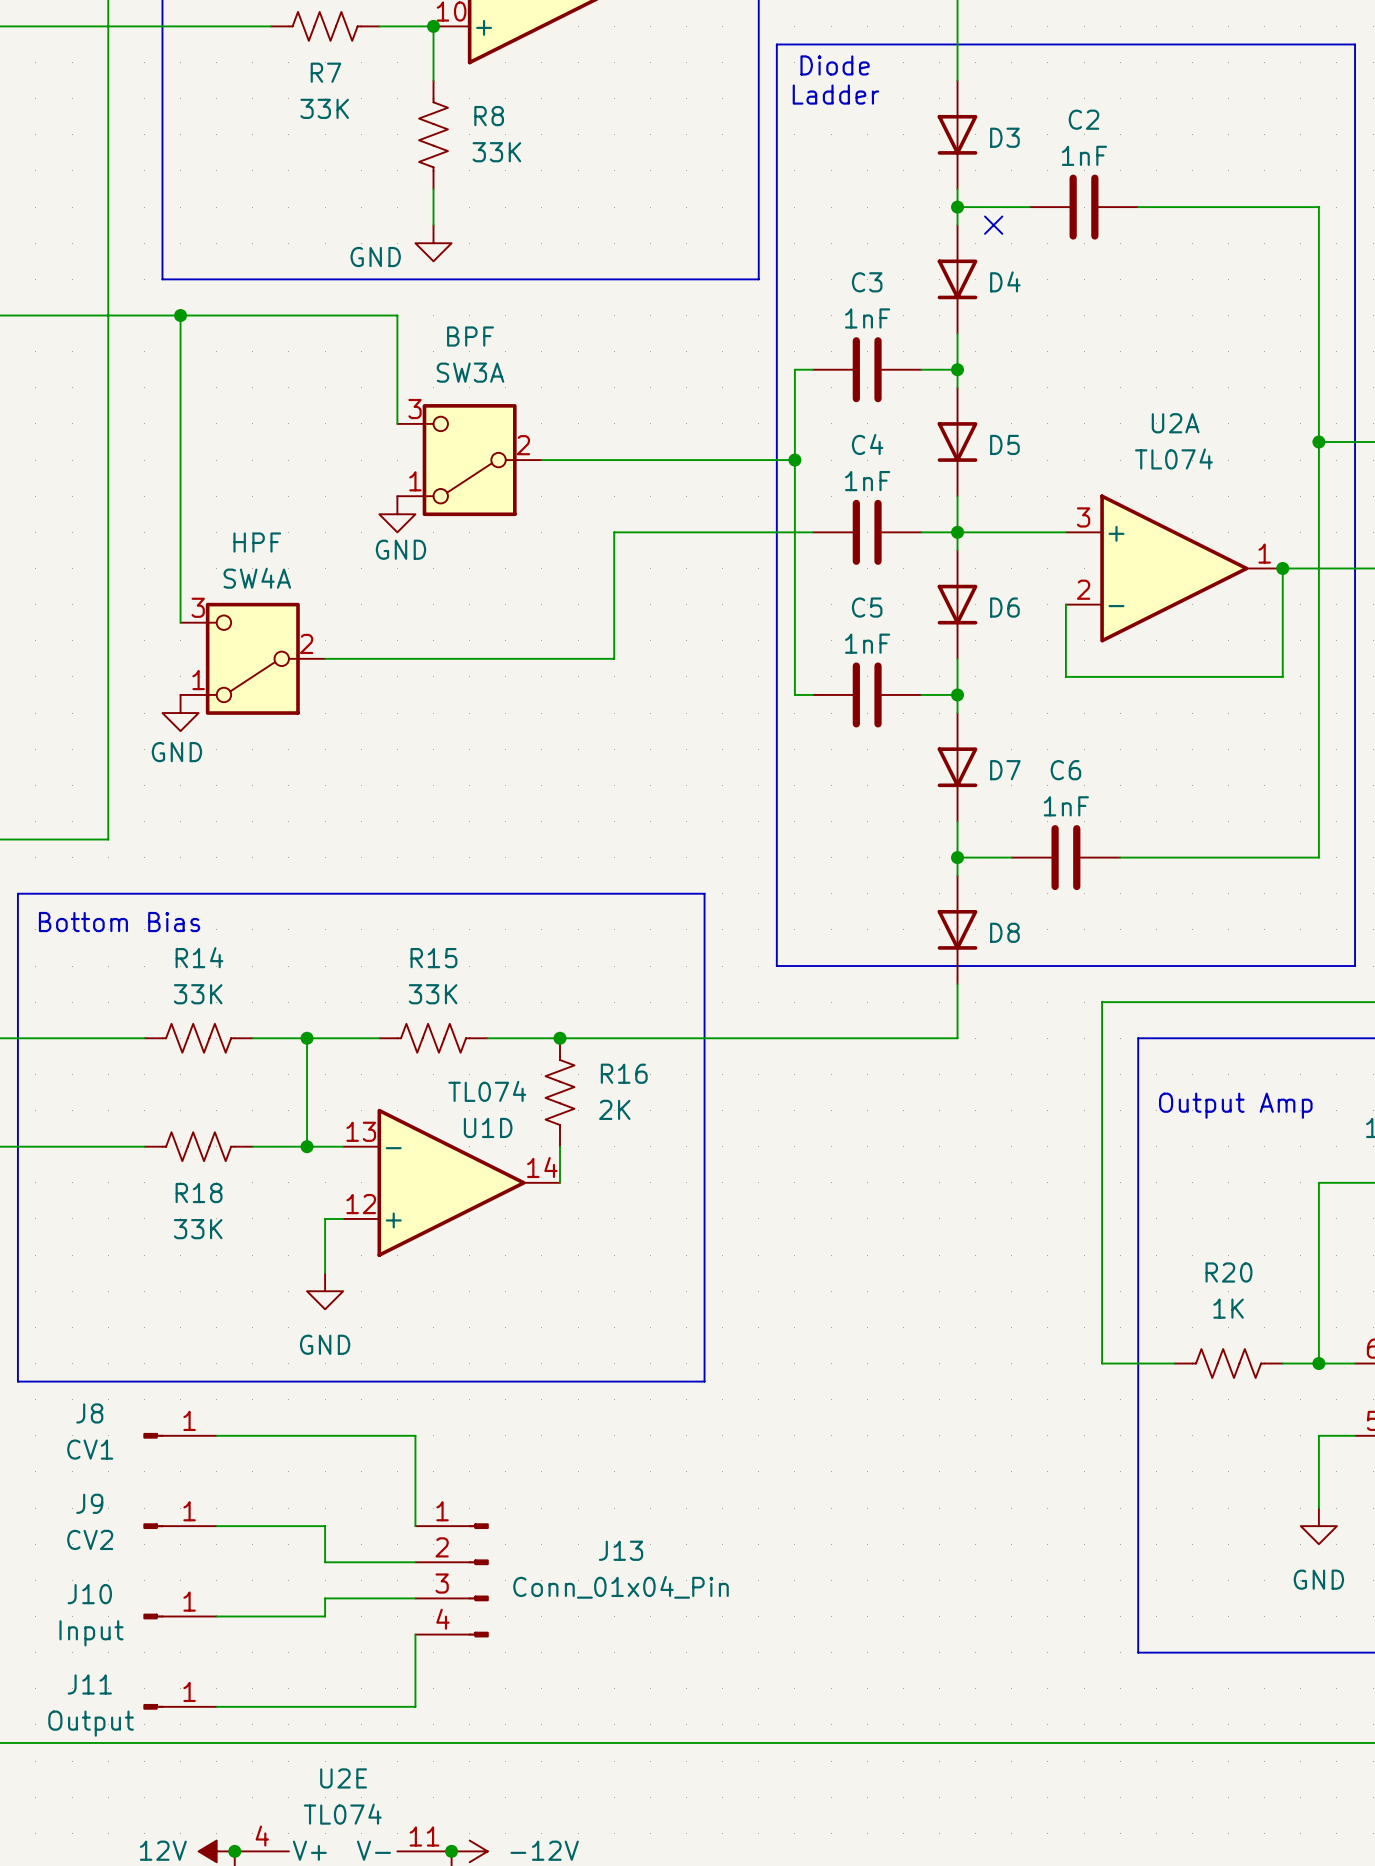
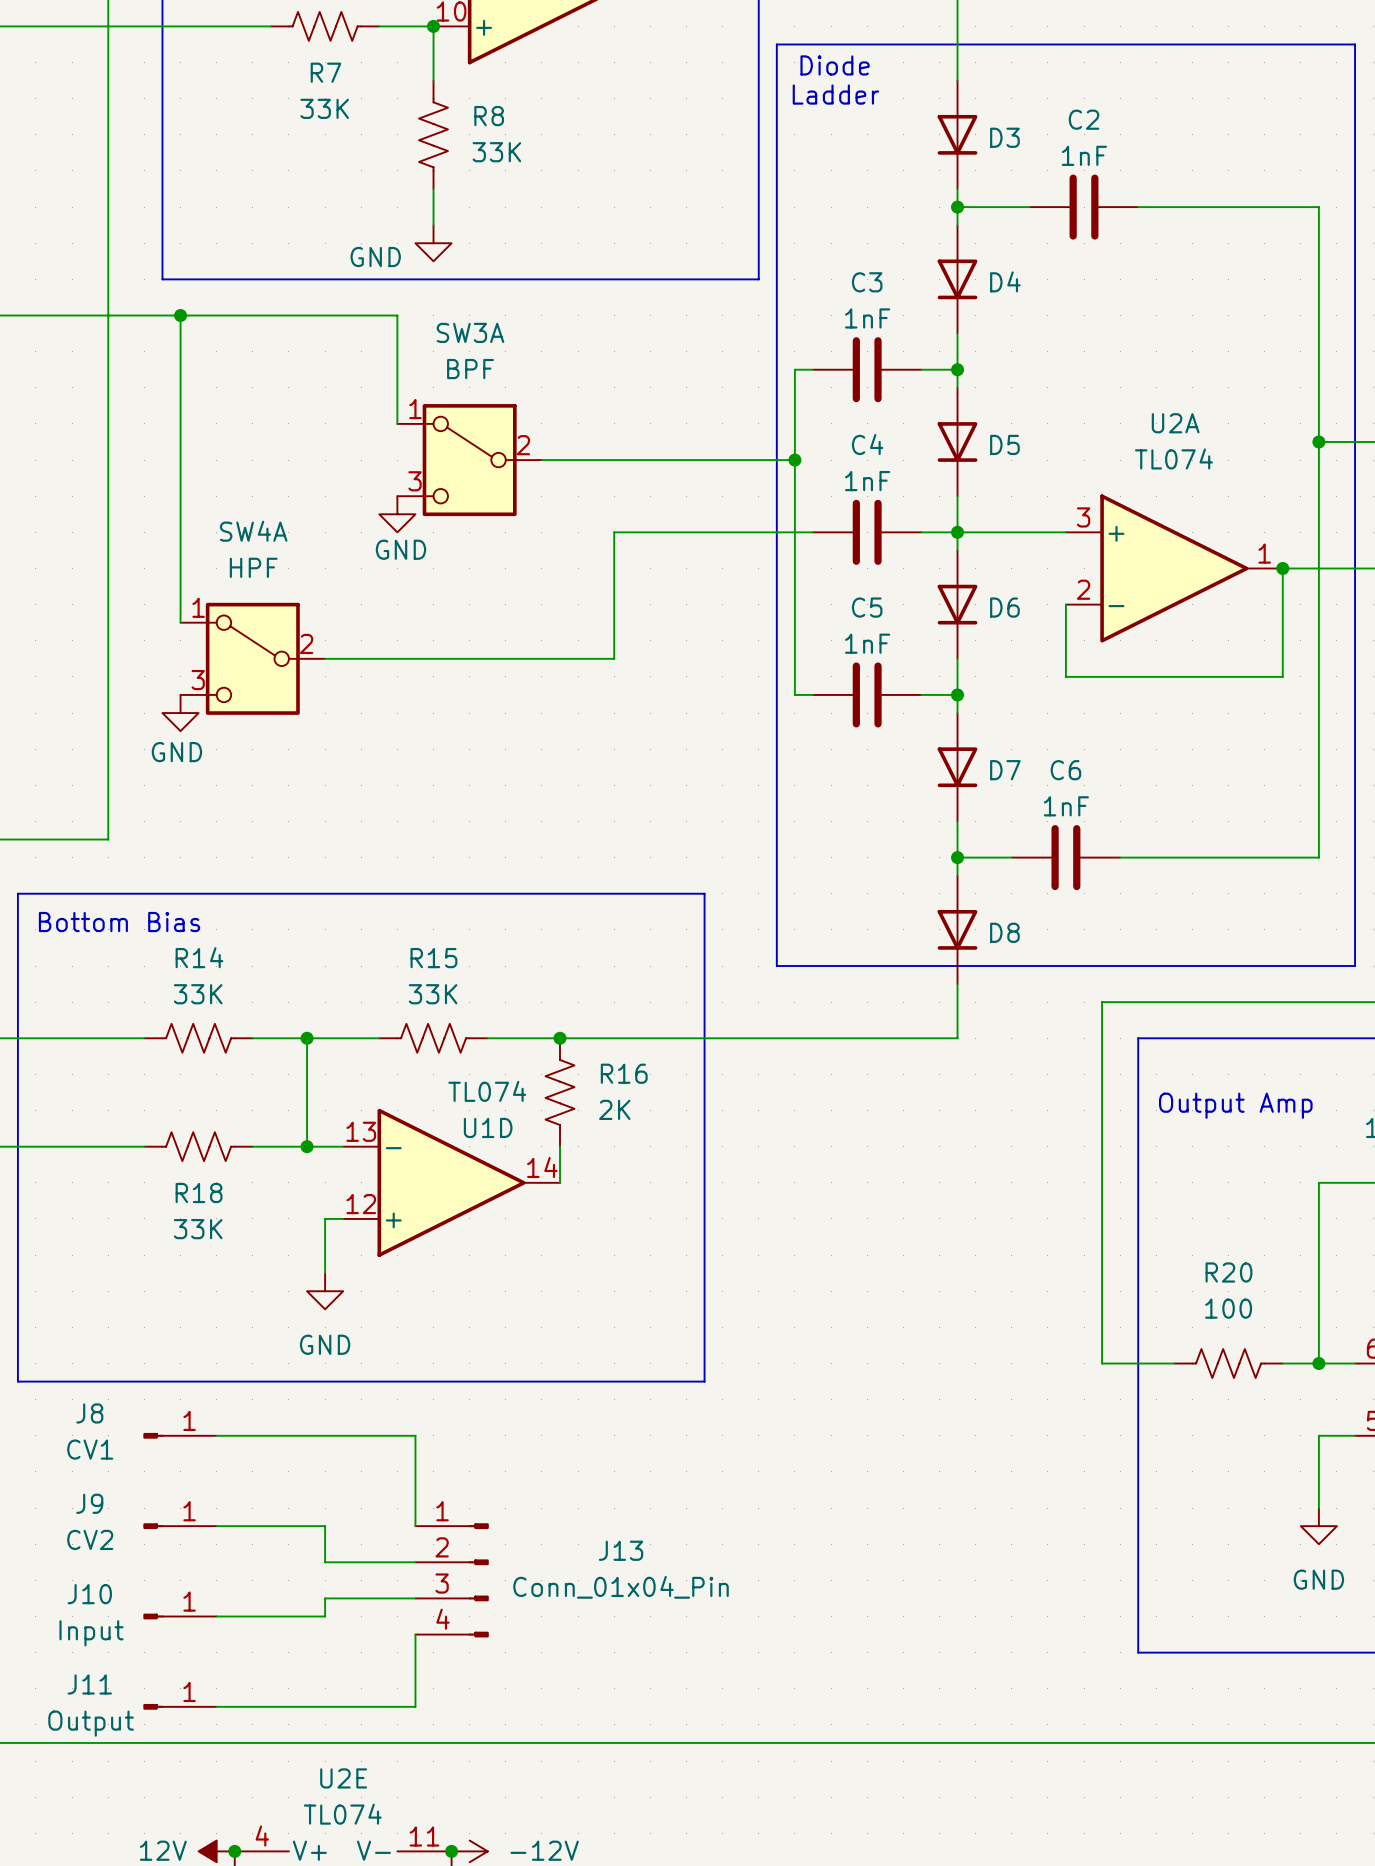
no-connect mark: (993, 225) -> none
SW3A value position: BPF (470, 336) -> BPF (470, 369)
SW3A name position: SW3A (470, 372) -> SW3A (470, 332)
SW3A flip: as is (469, 460) -> up-down (469, 460)
SW4A name position: SW4A (257, 578) -> SW4A (253, 531)
SW4A flip: as is (252, 658) -> up-down (252, 658)
R20 value: 1K (1228, 1308) -> 100 (1228, 1308)

